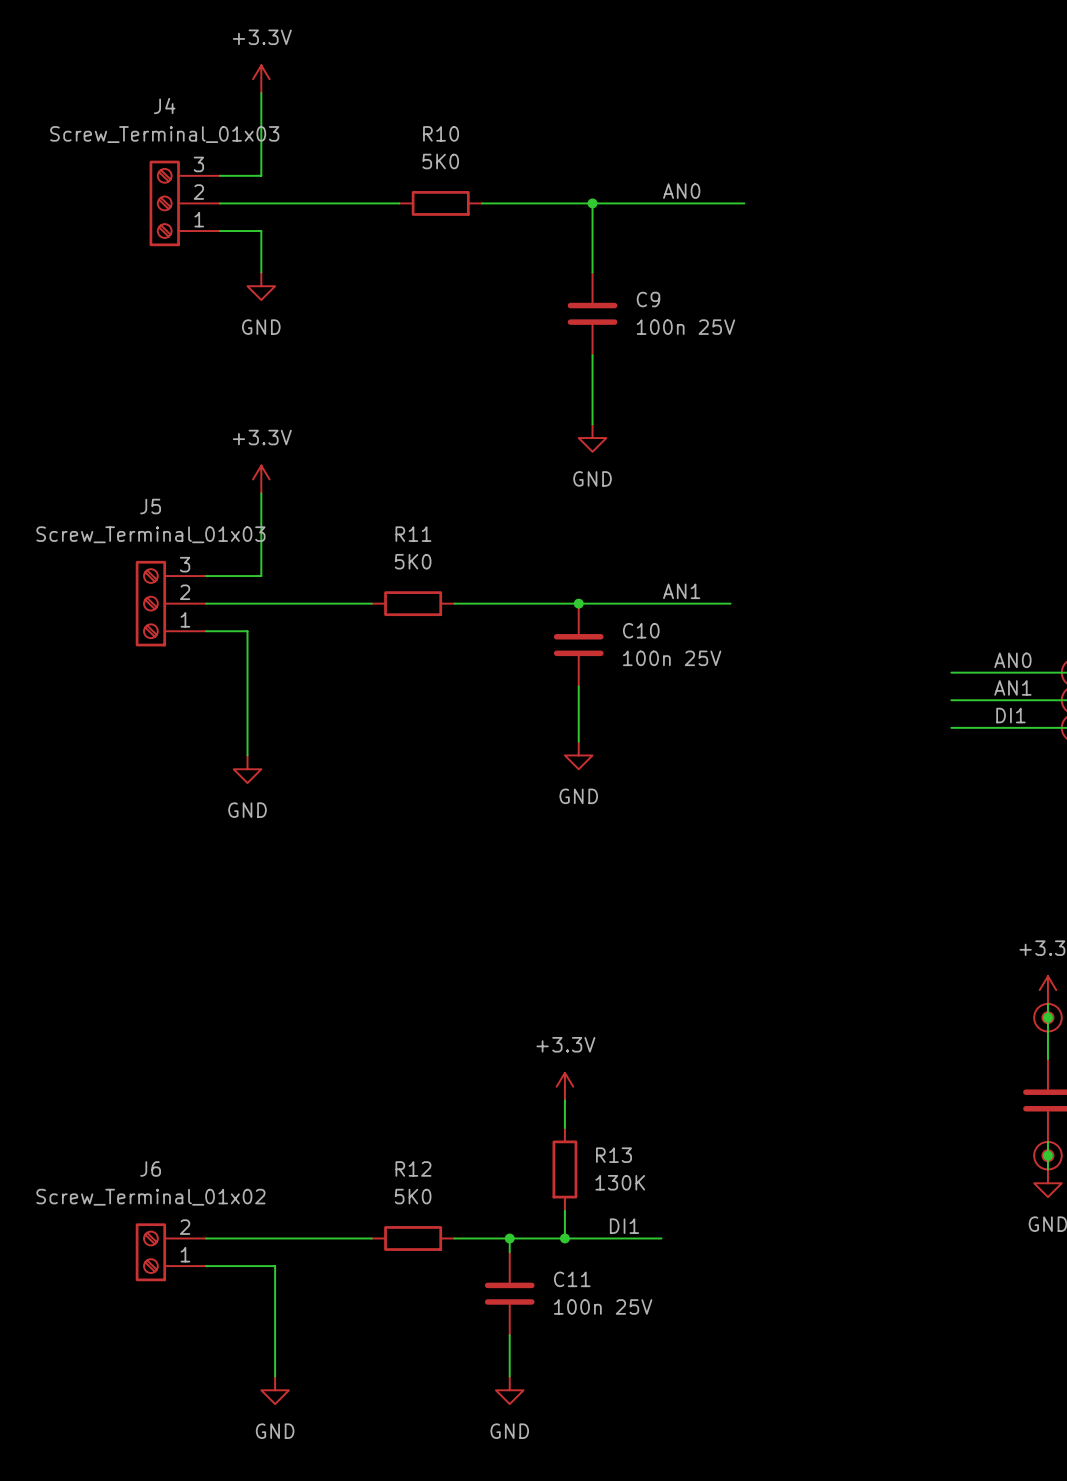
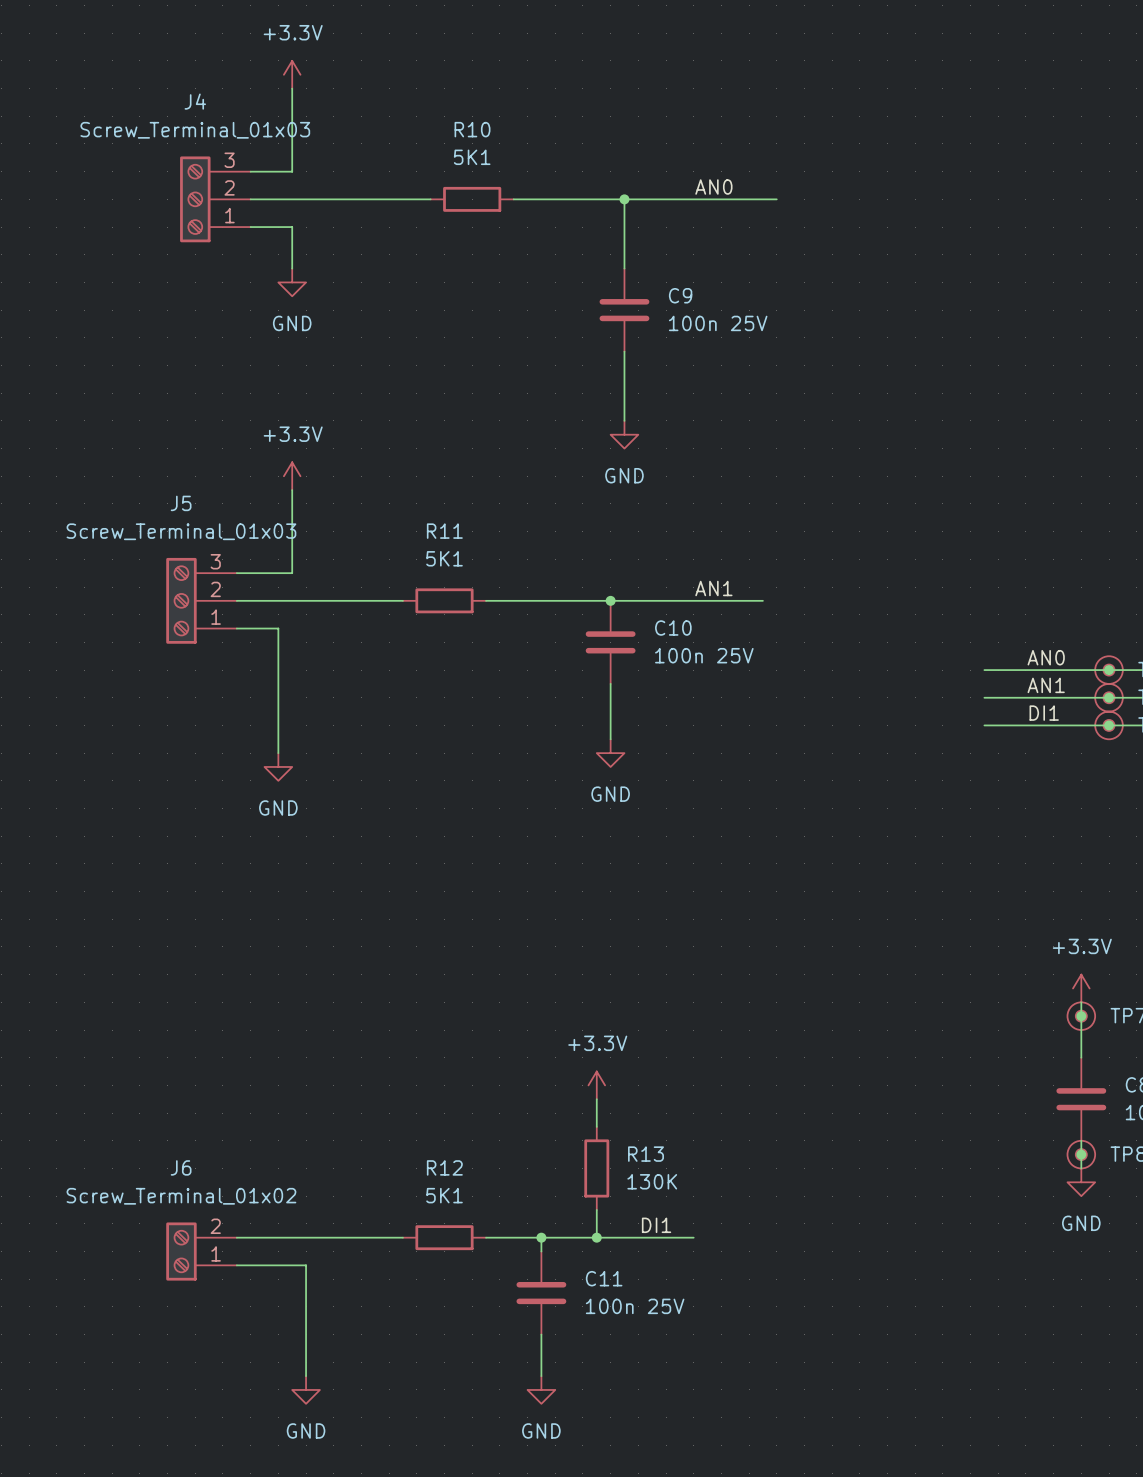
R10 value: 5K0 (440, 161) -> 5K1 (472, 157)
R11 value: 5K0 (413, 561) -> 5K1 (444, 558)
R12 value: 5K0 (413, 1196) -> 5K1 (444, 1195)

